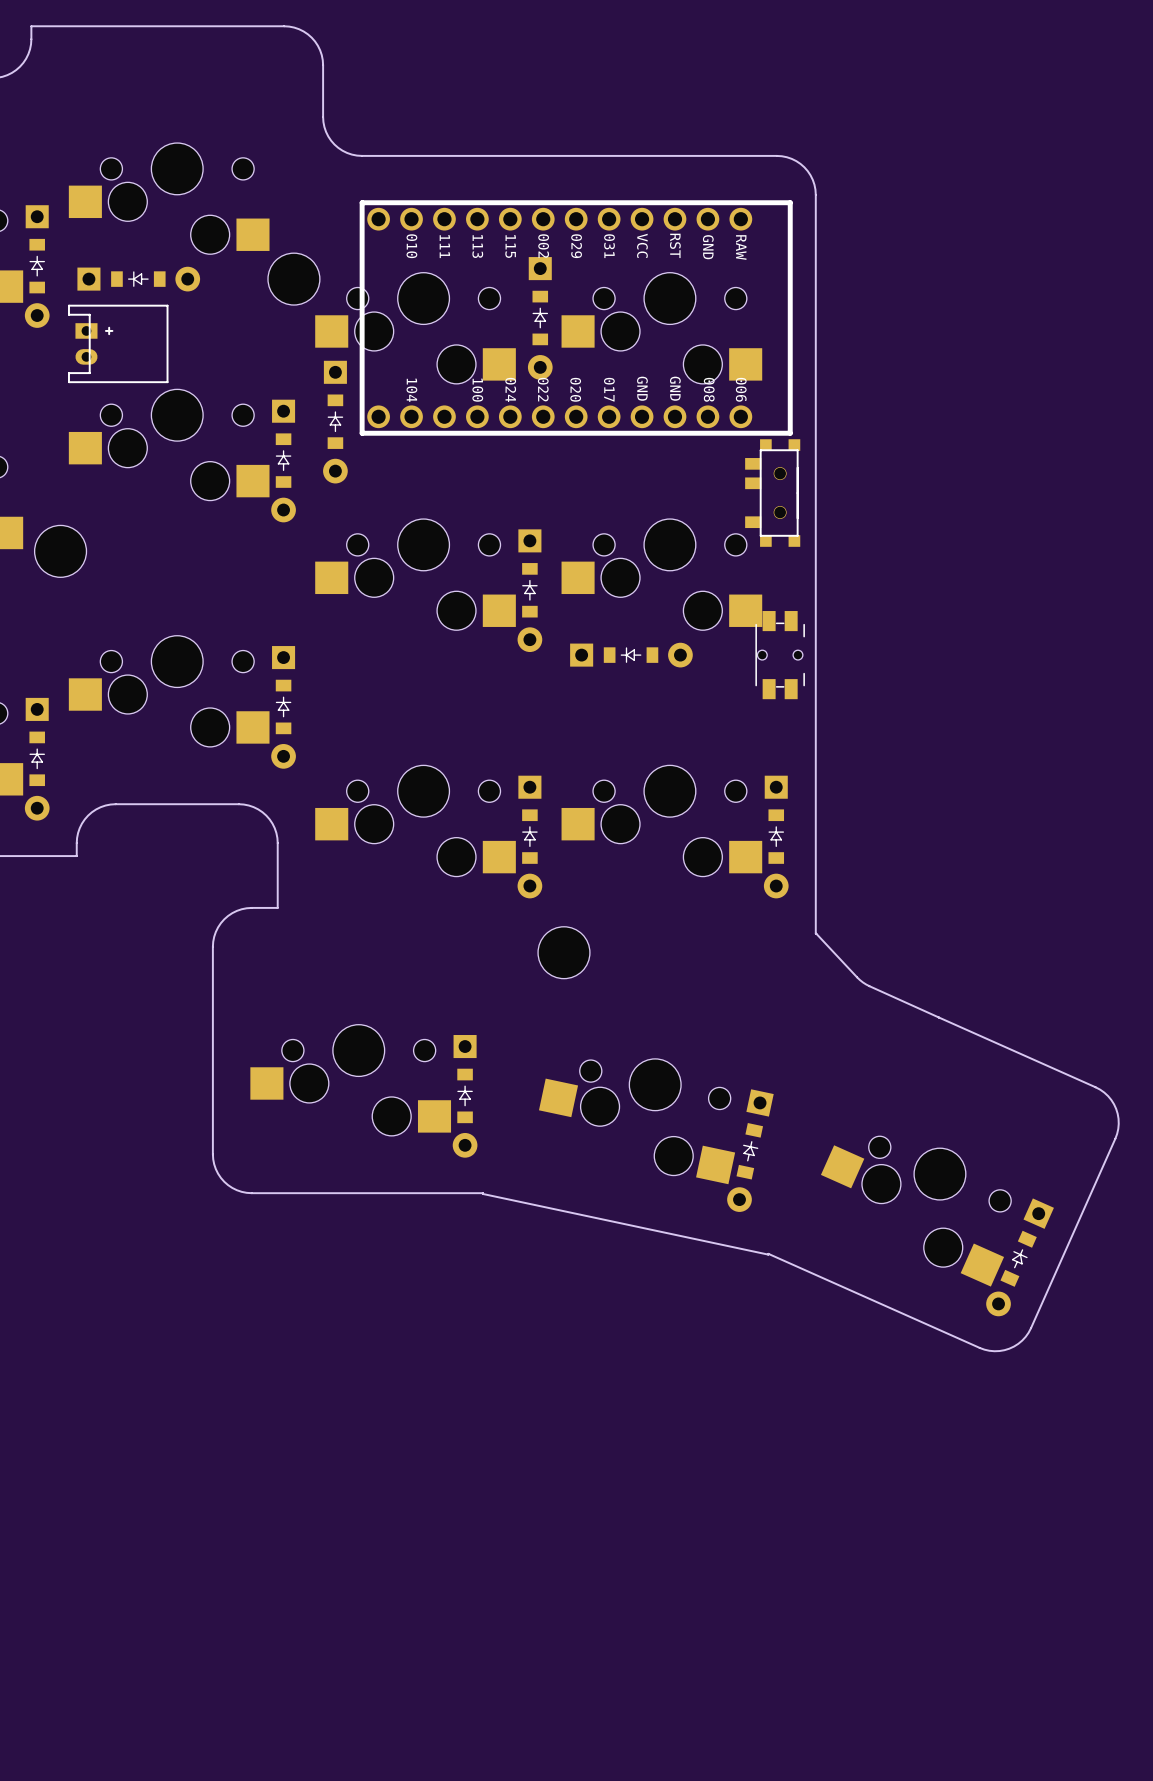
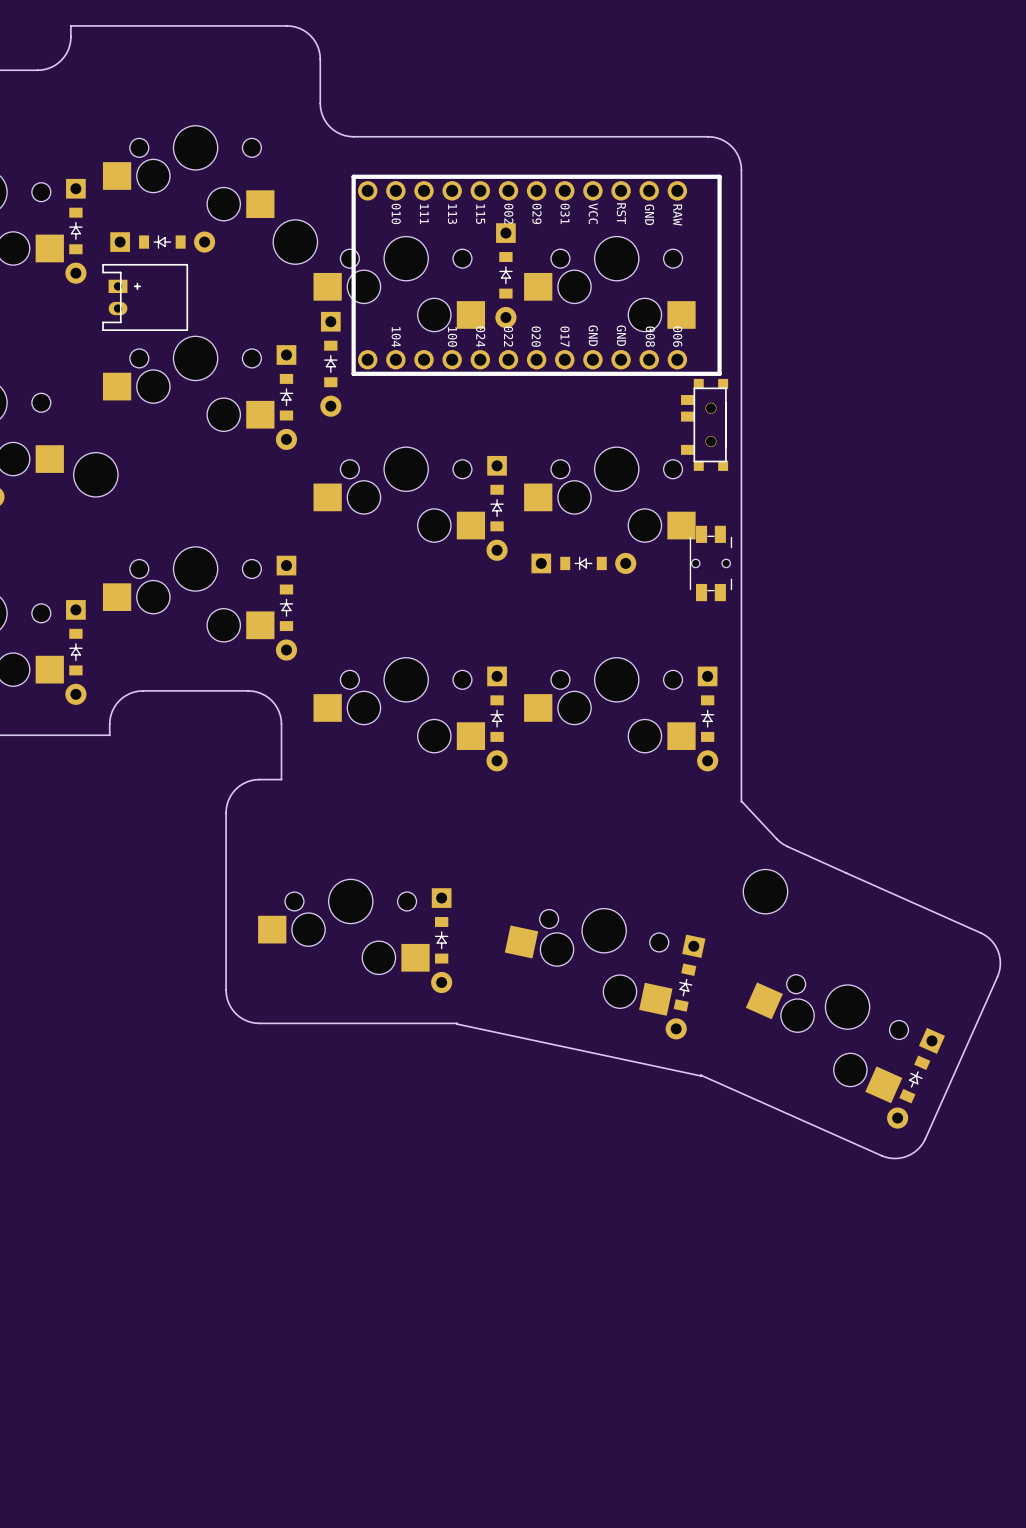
part position: (563, 952) -> (765, 891)

